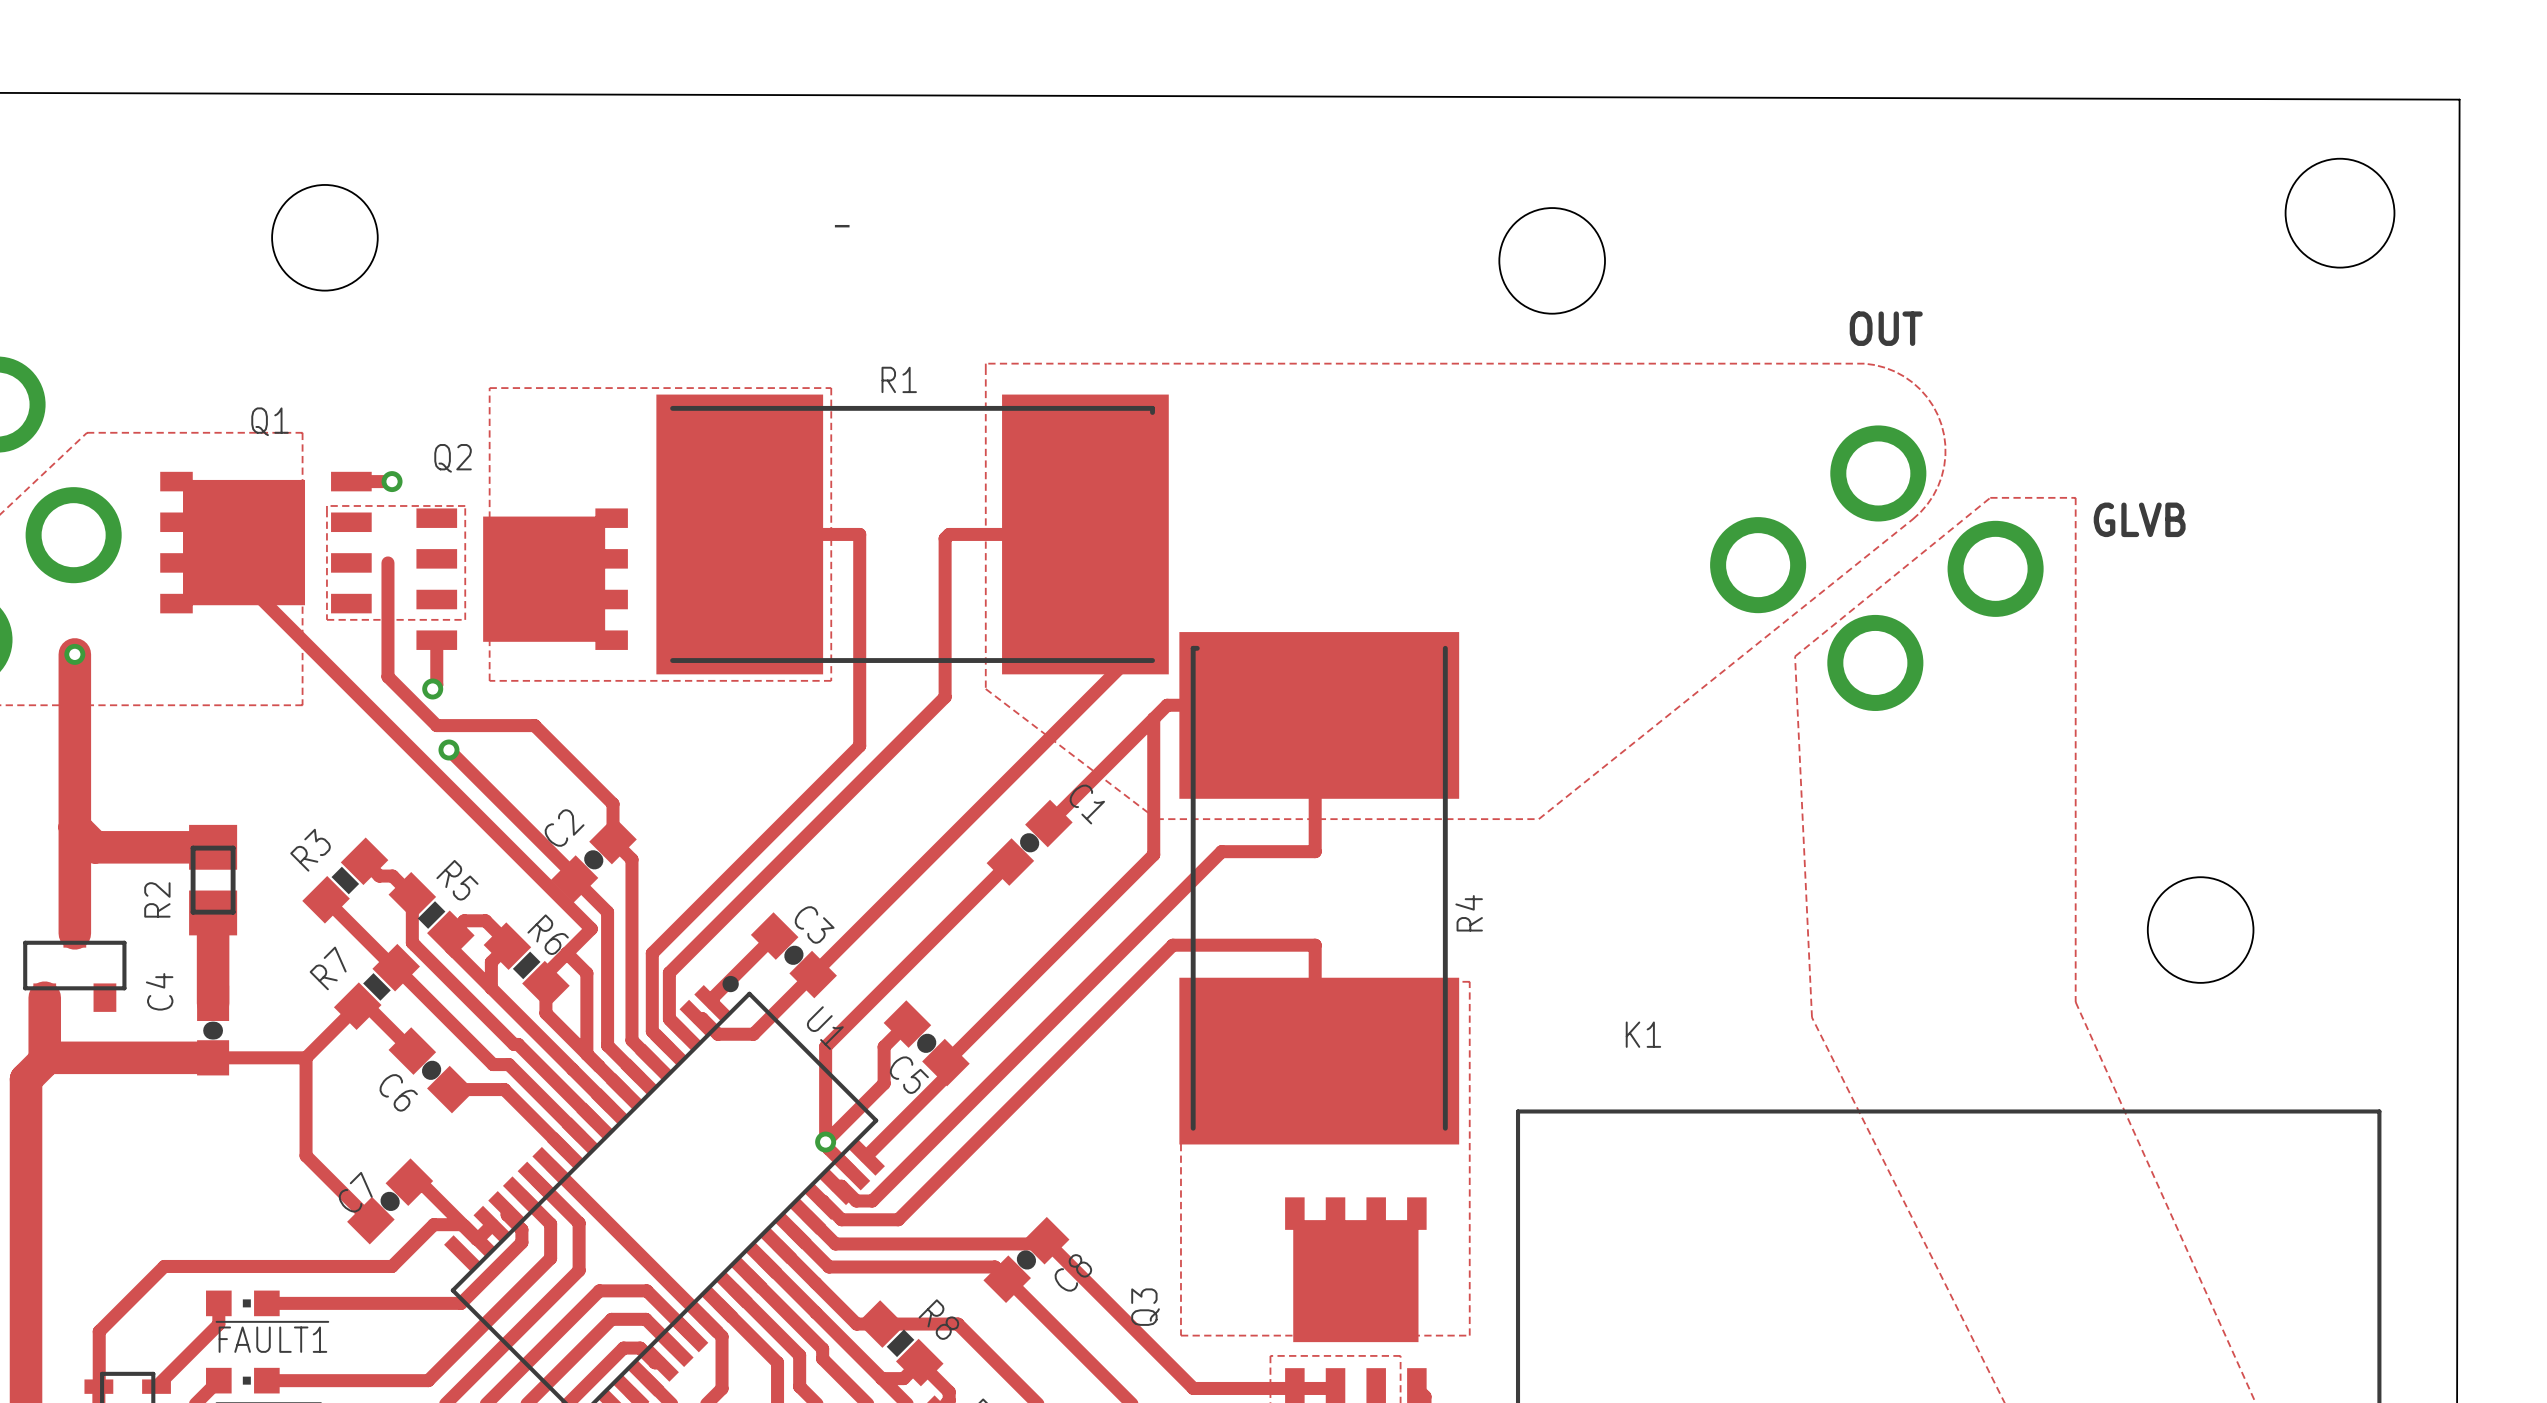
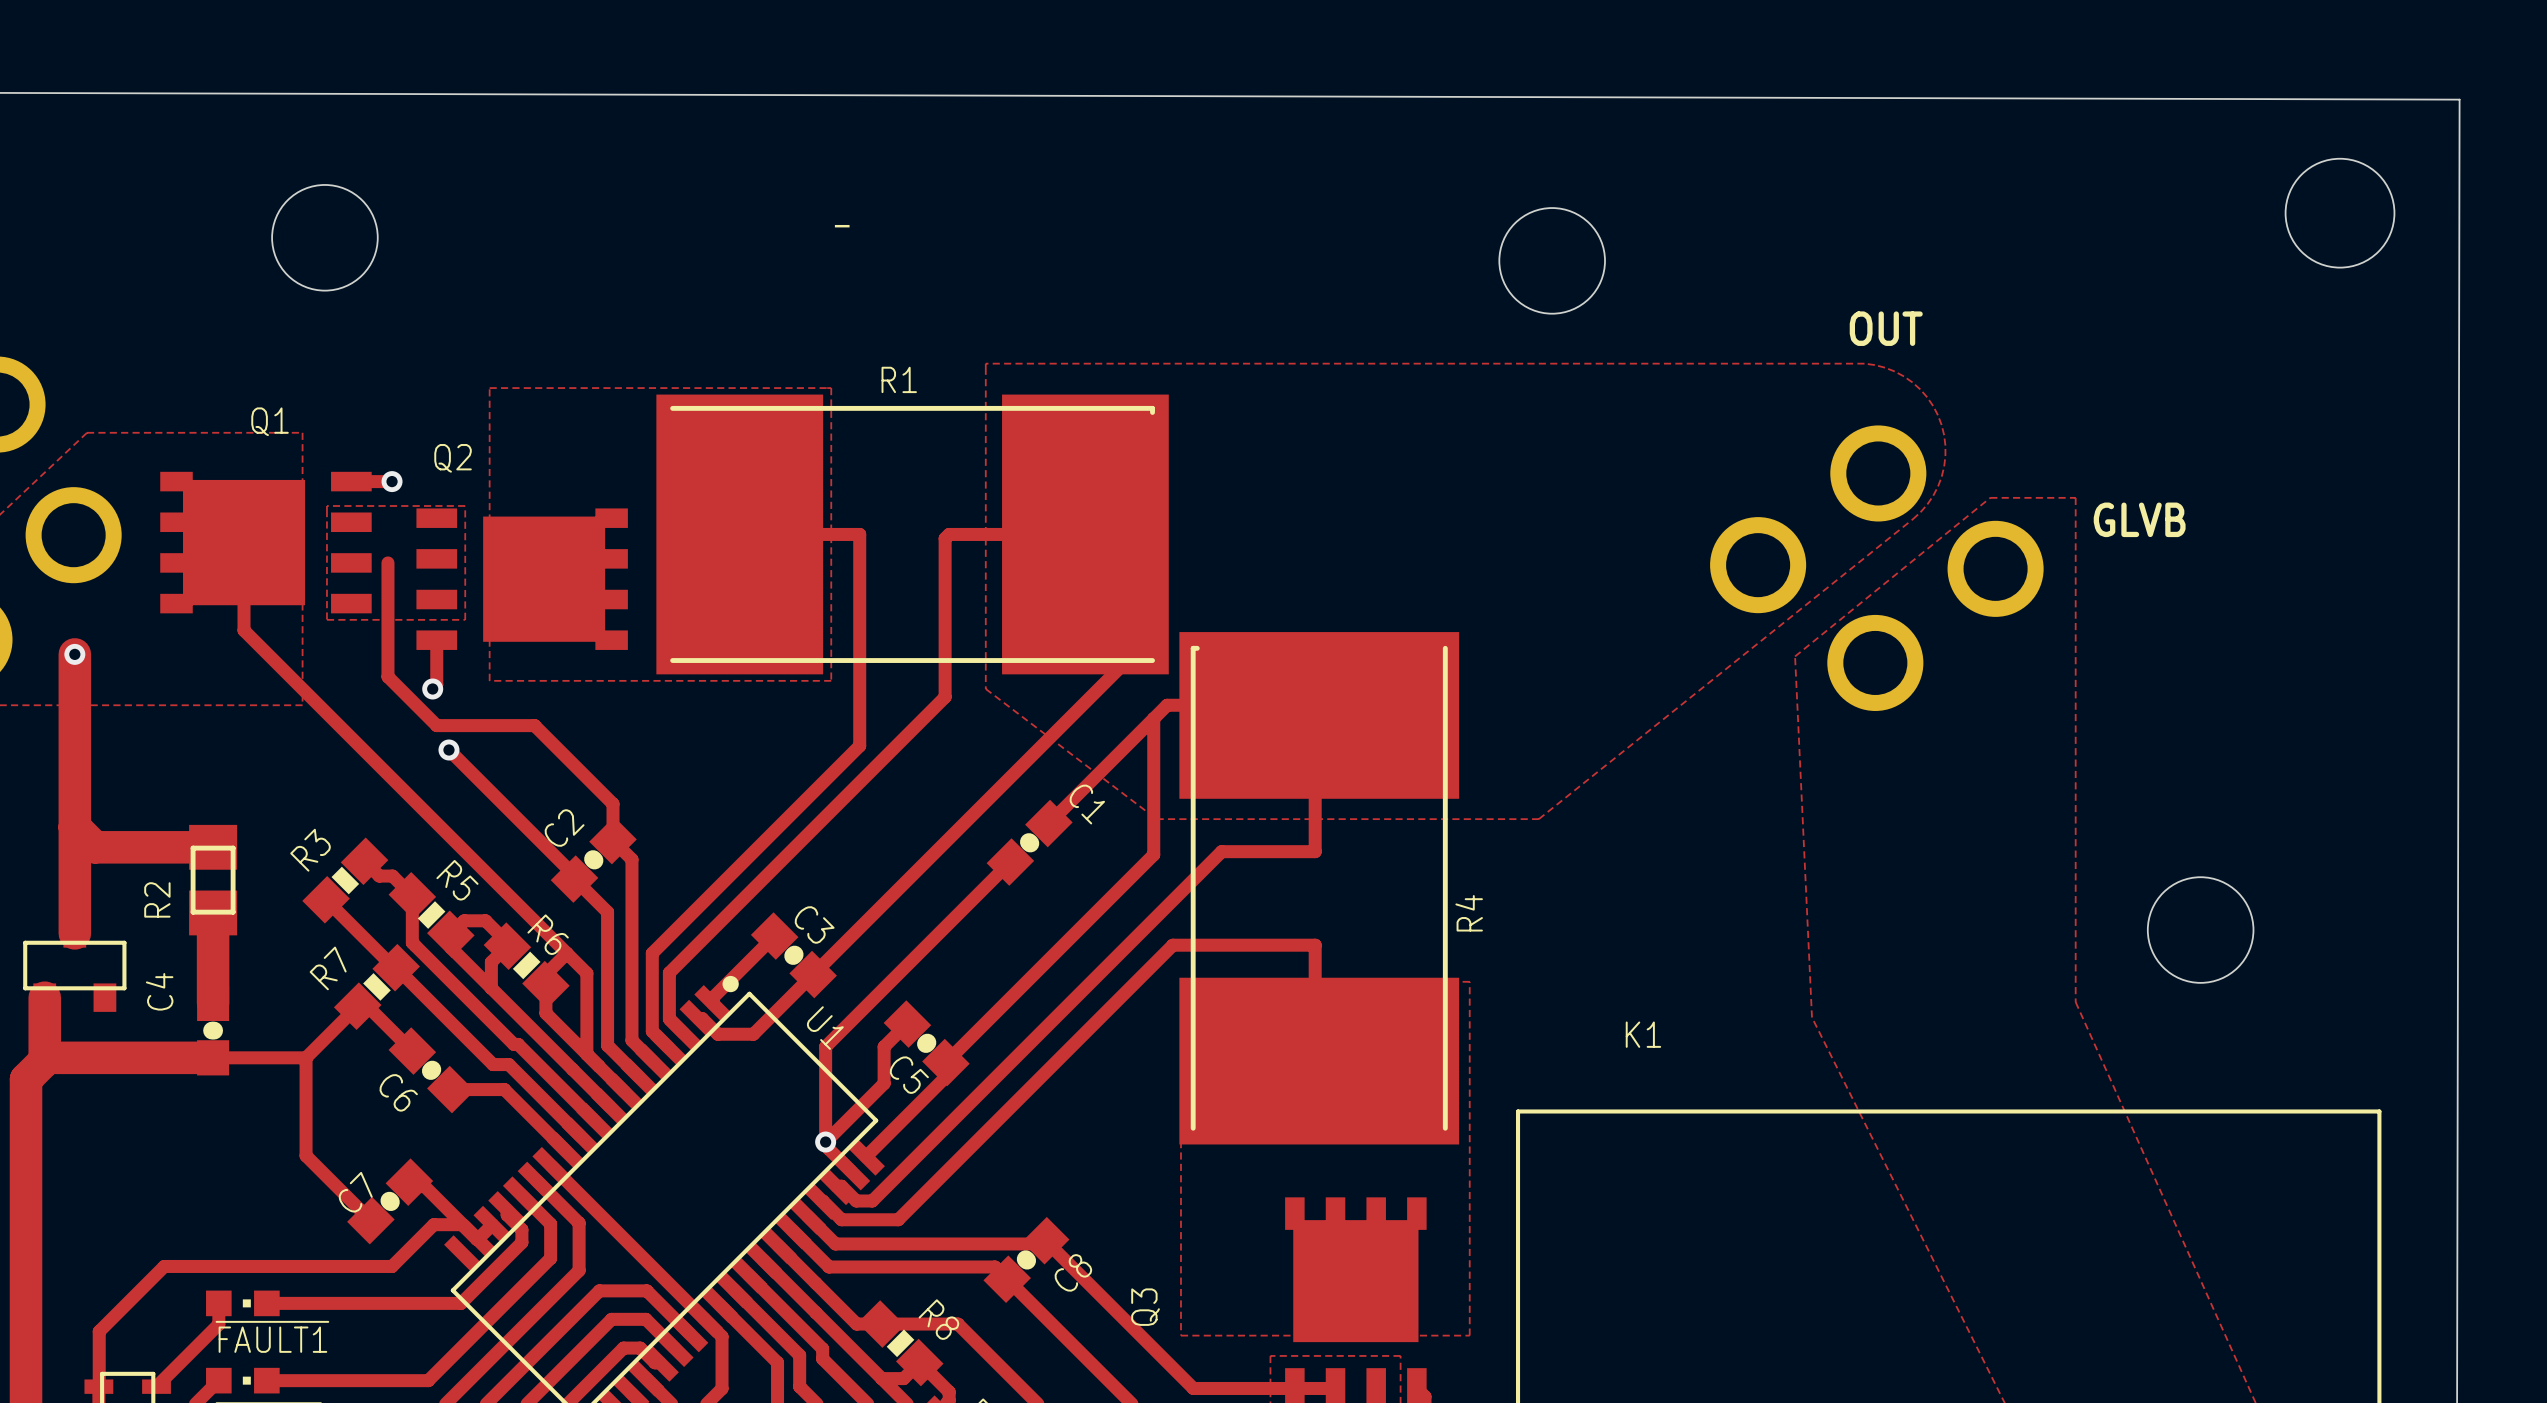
track: (244, 581) (591, 928) (566, 953) -> (244, 581) (244, 630) (566, 953)

